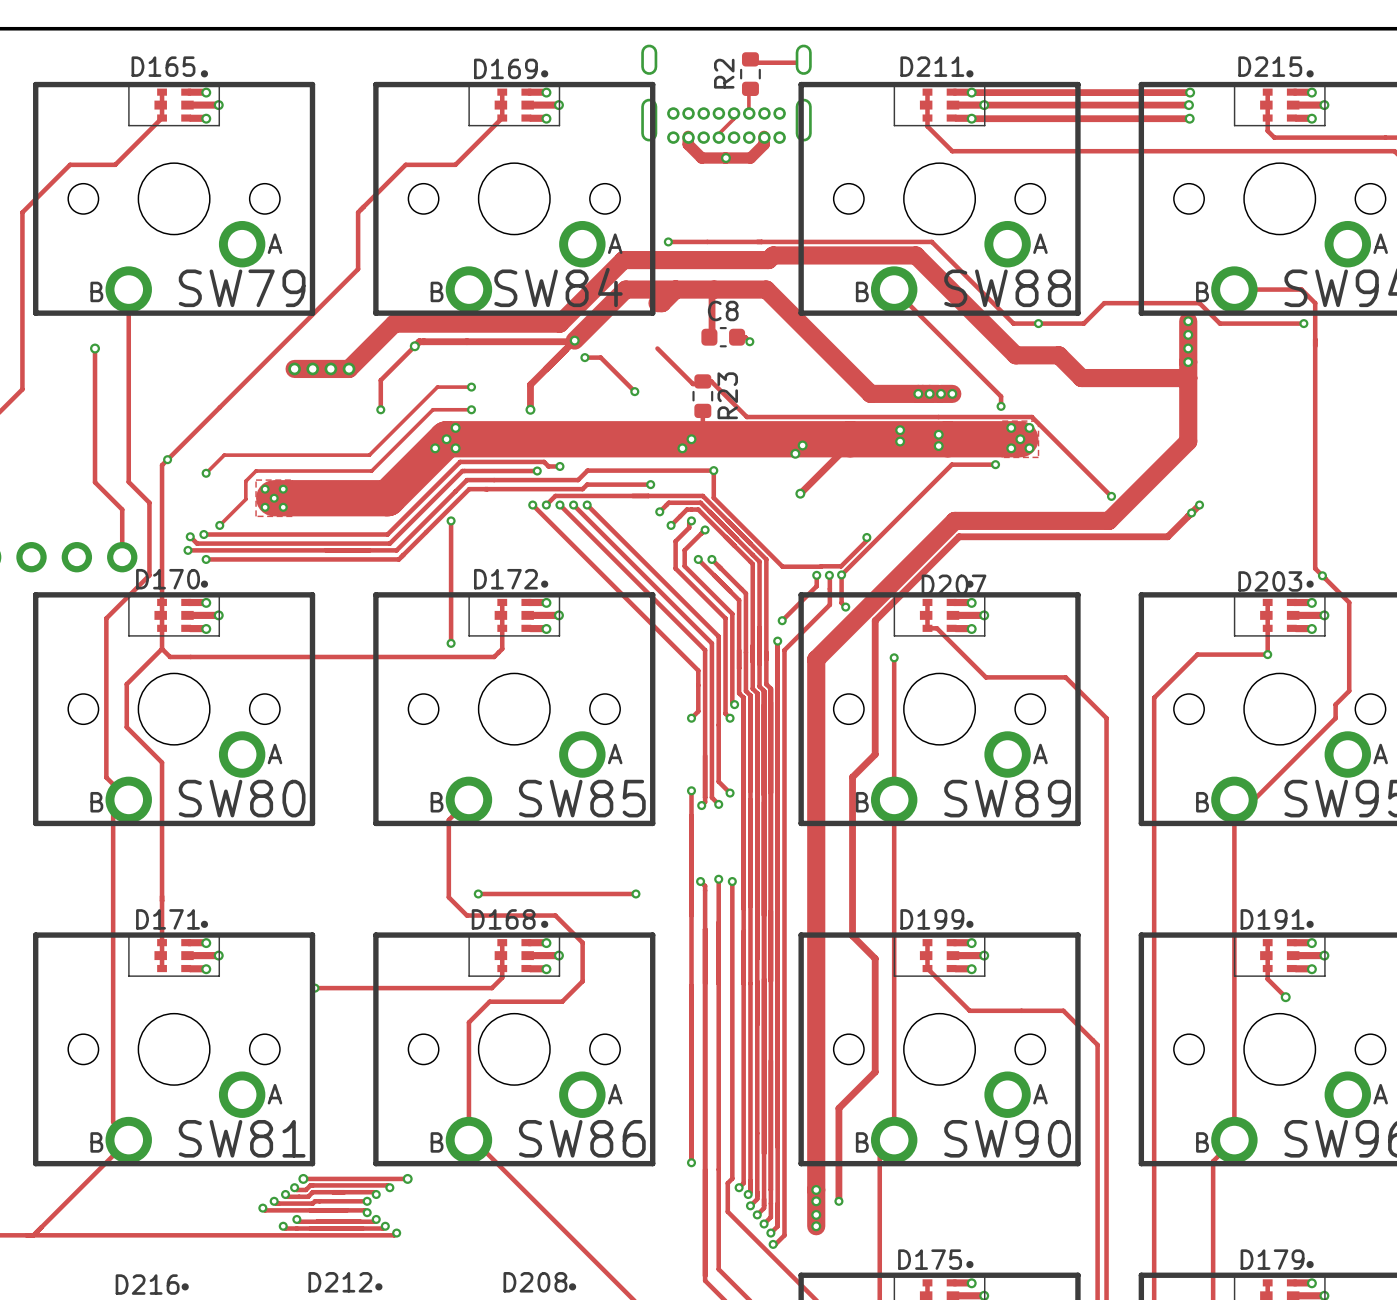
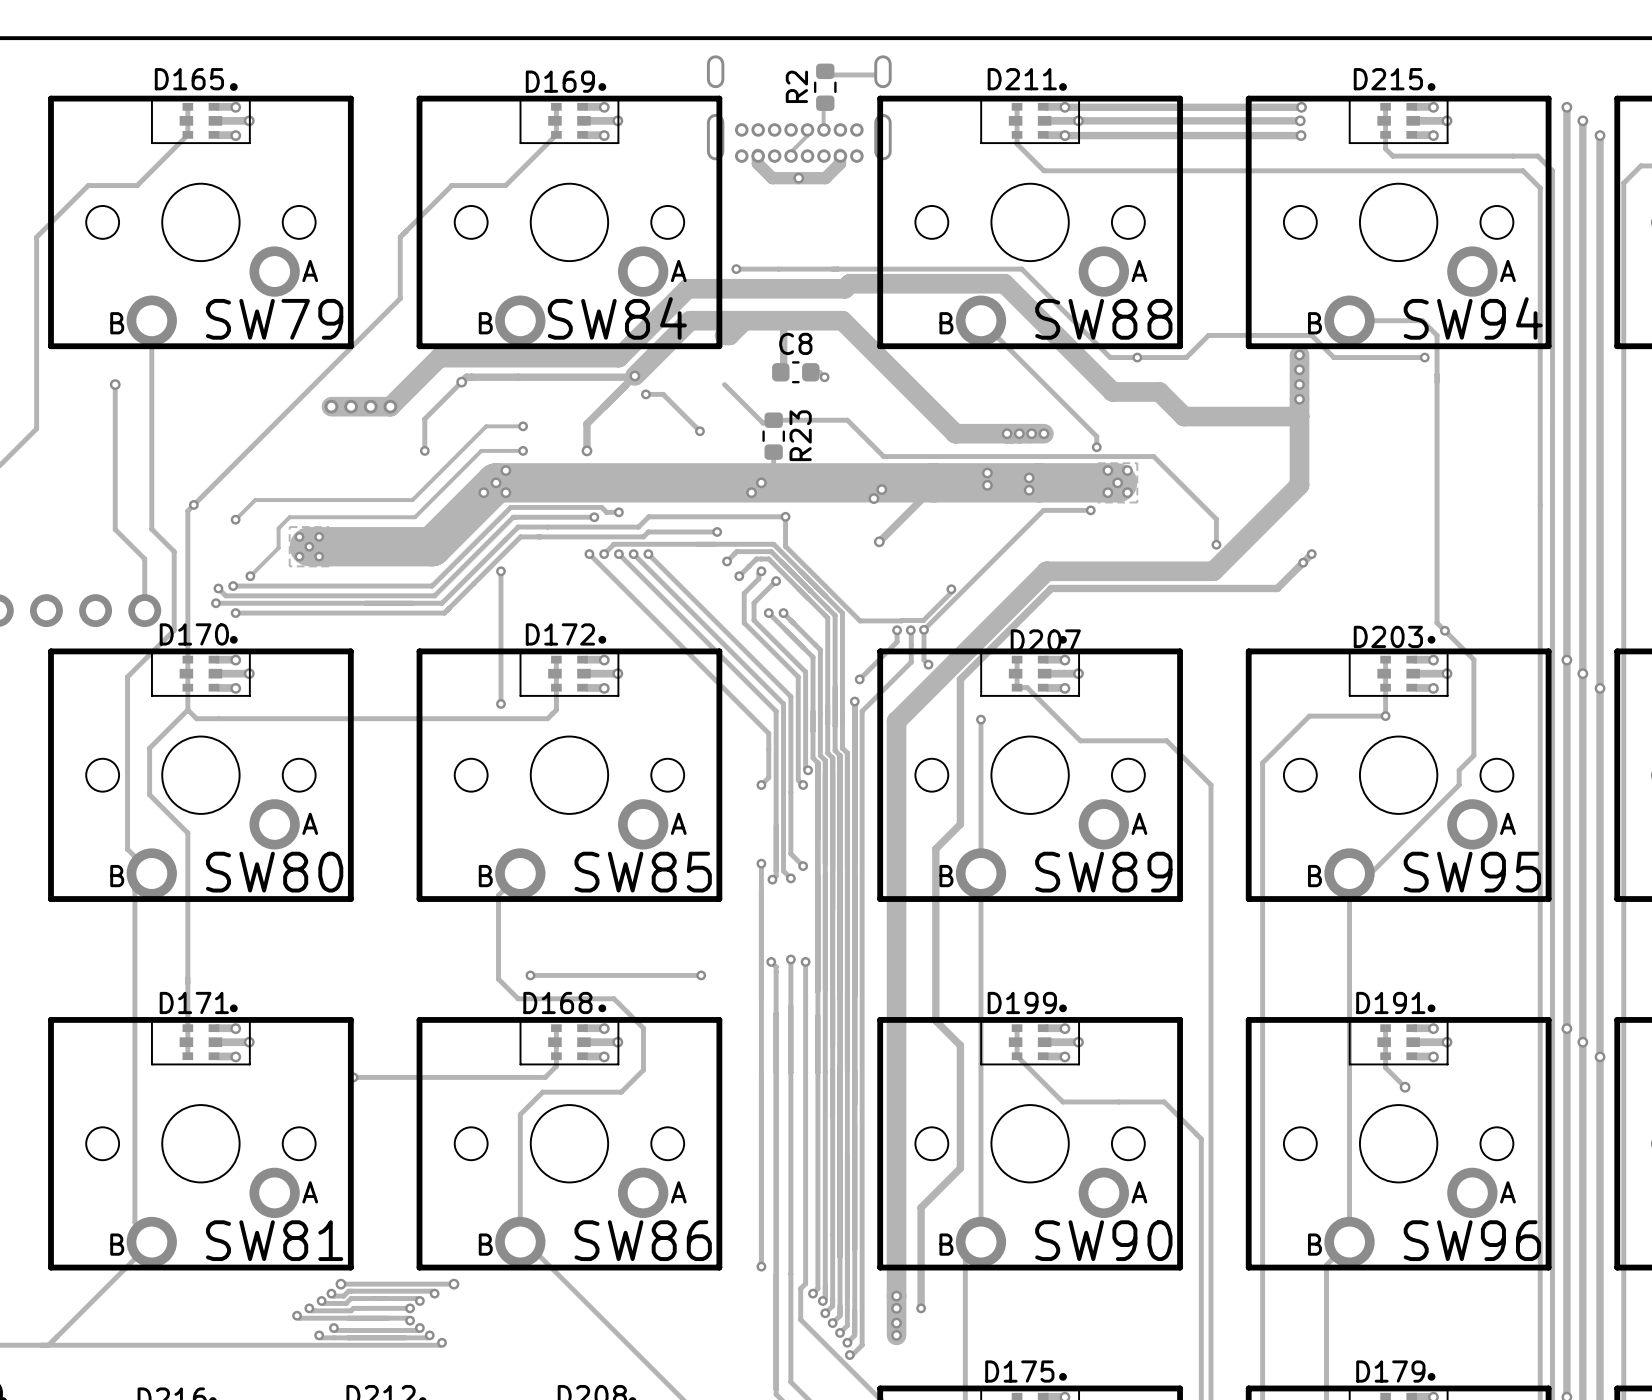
track: (711, 381) (746, 417) (1031, 417) (1112, 497) -> (782, 420) (847, 420) (883, 456) (1153, 456) (1216, 519) (1216, 544)

